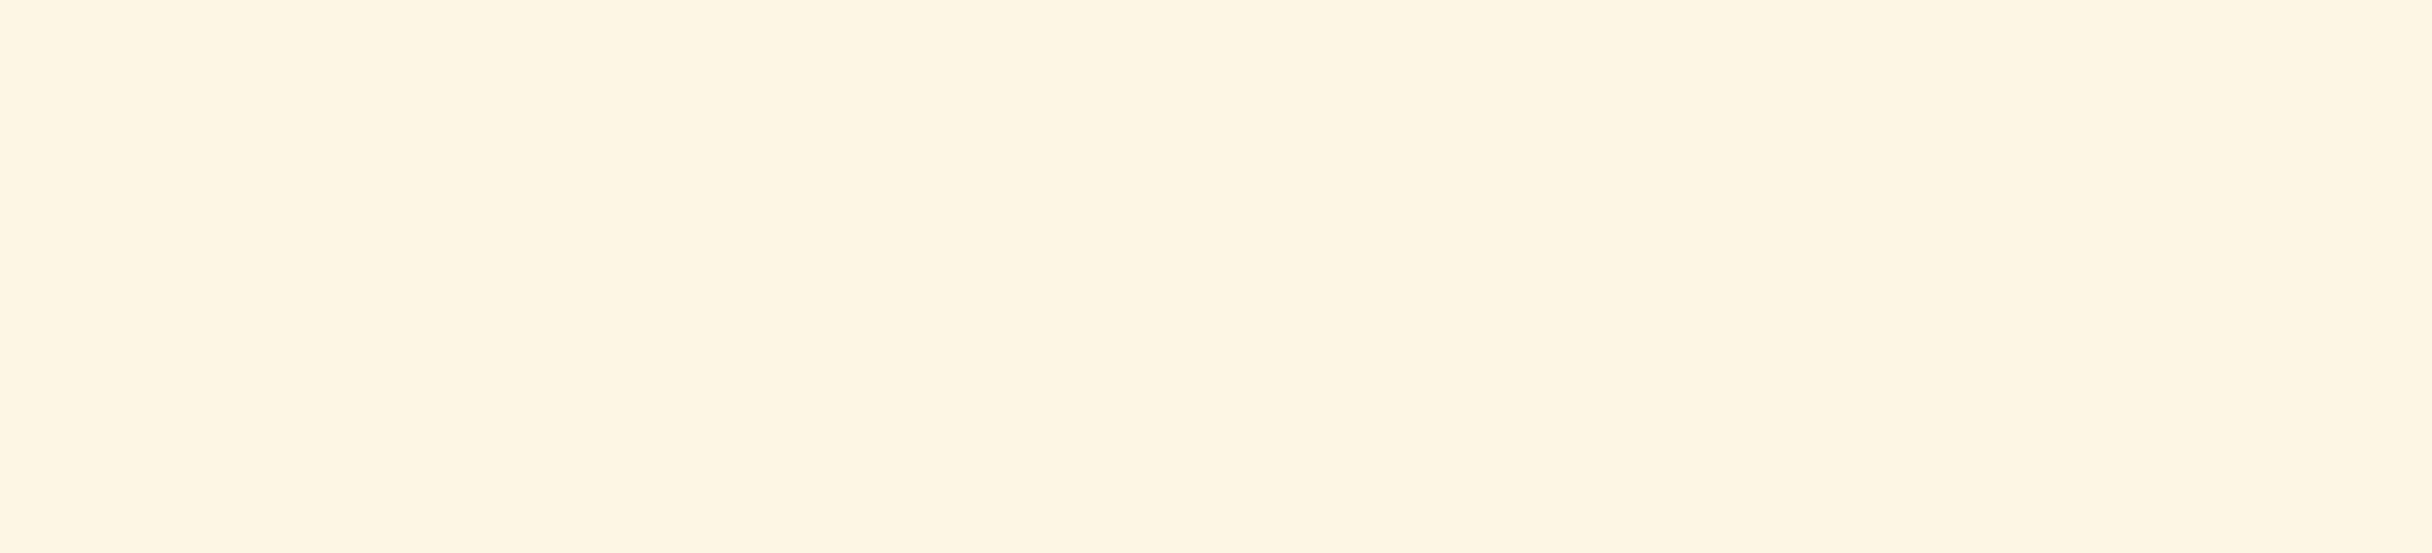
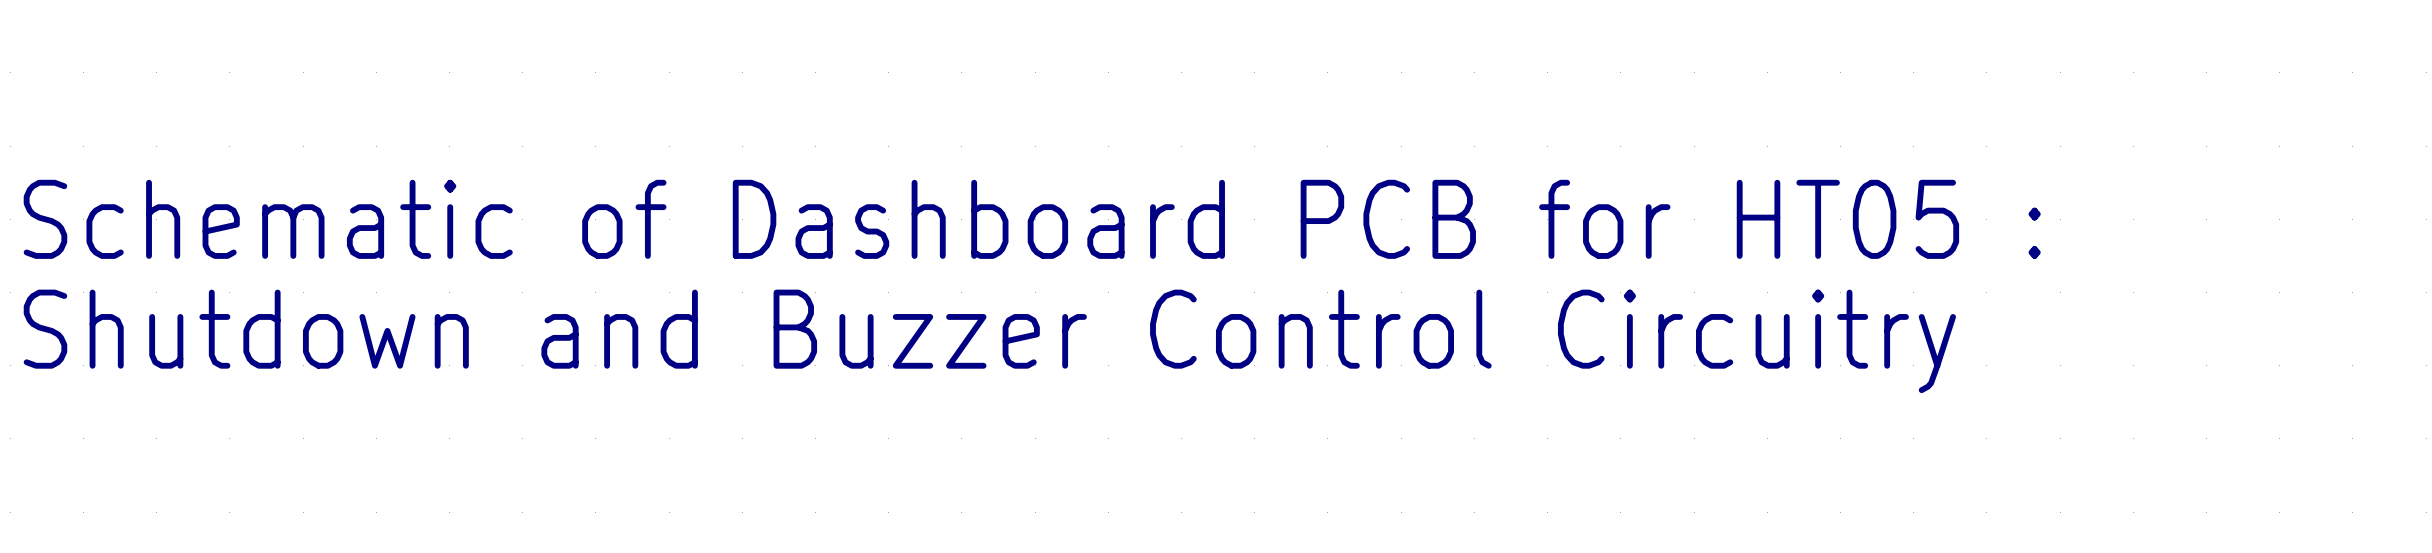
text: none -> Schematic of Dashboard PCB for HT05 : (1032, 219)
text: none -> Shutdown and Buzzer Control Circuitry (989, 341)

